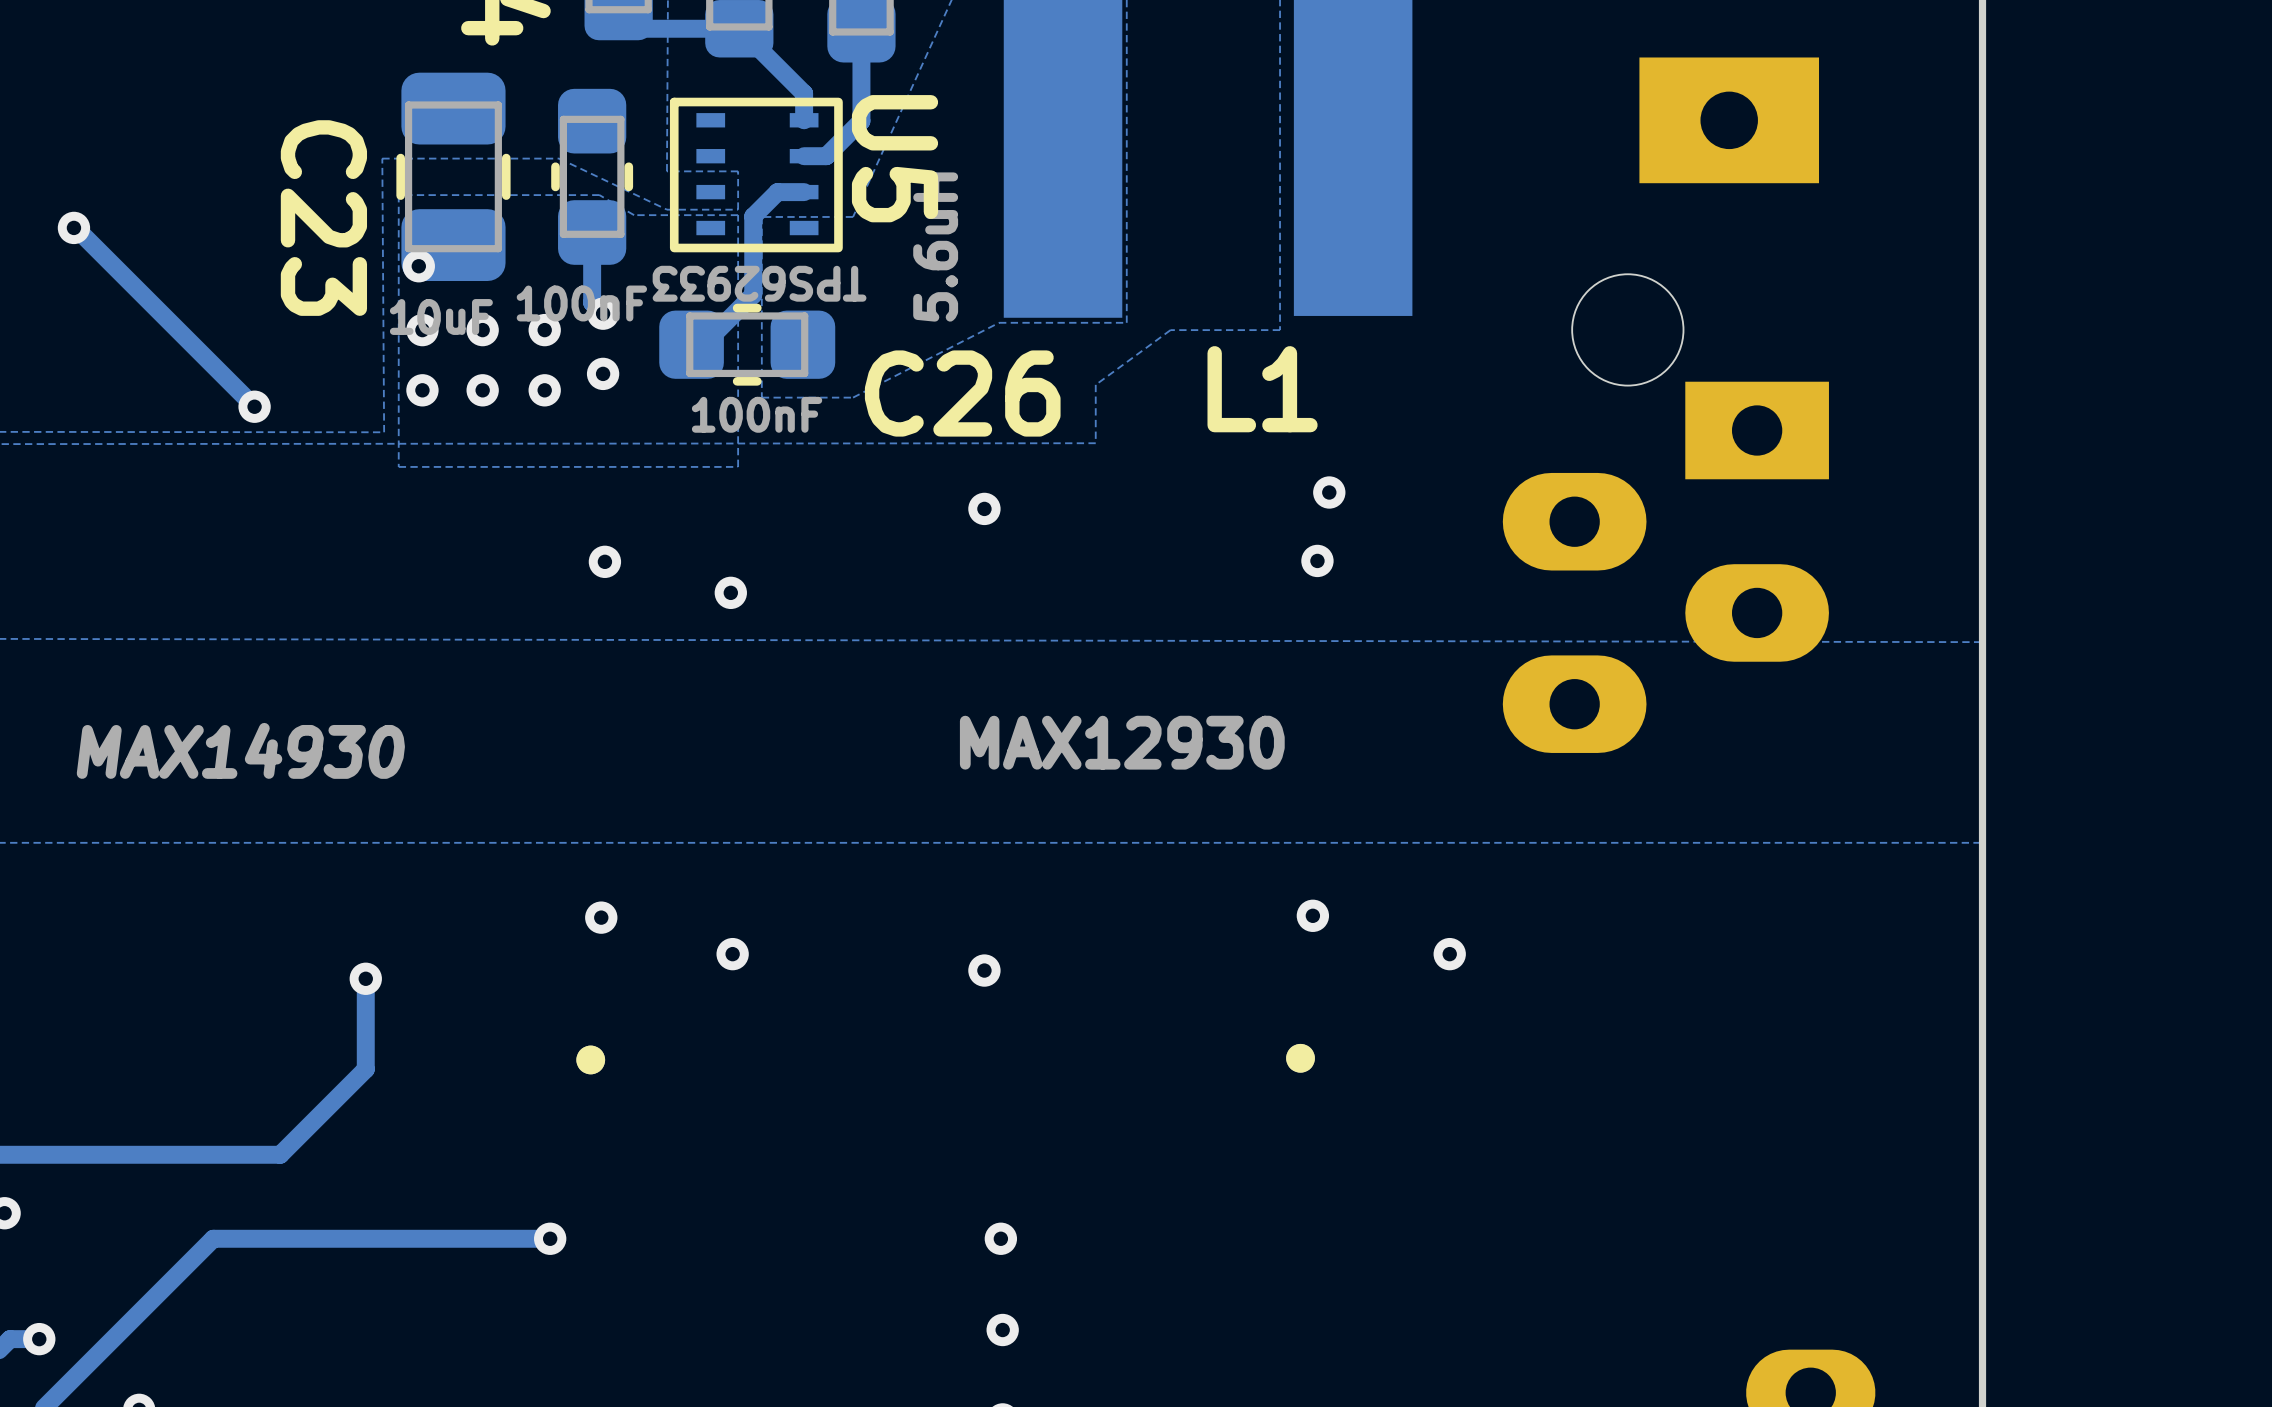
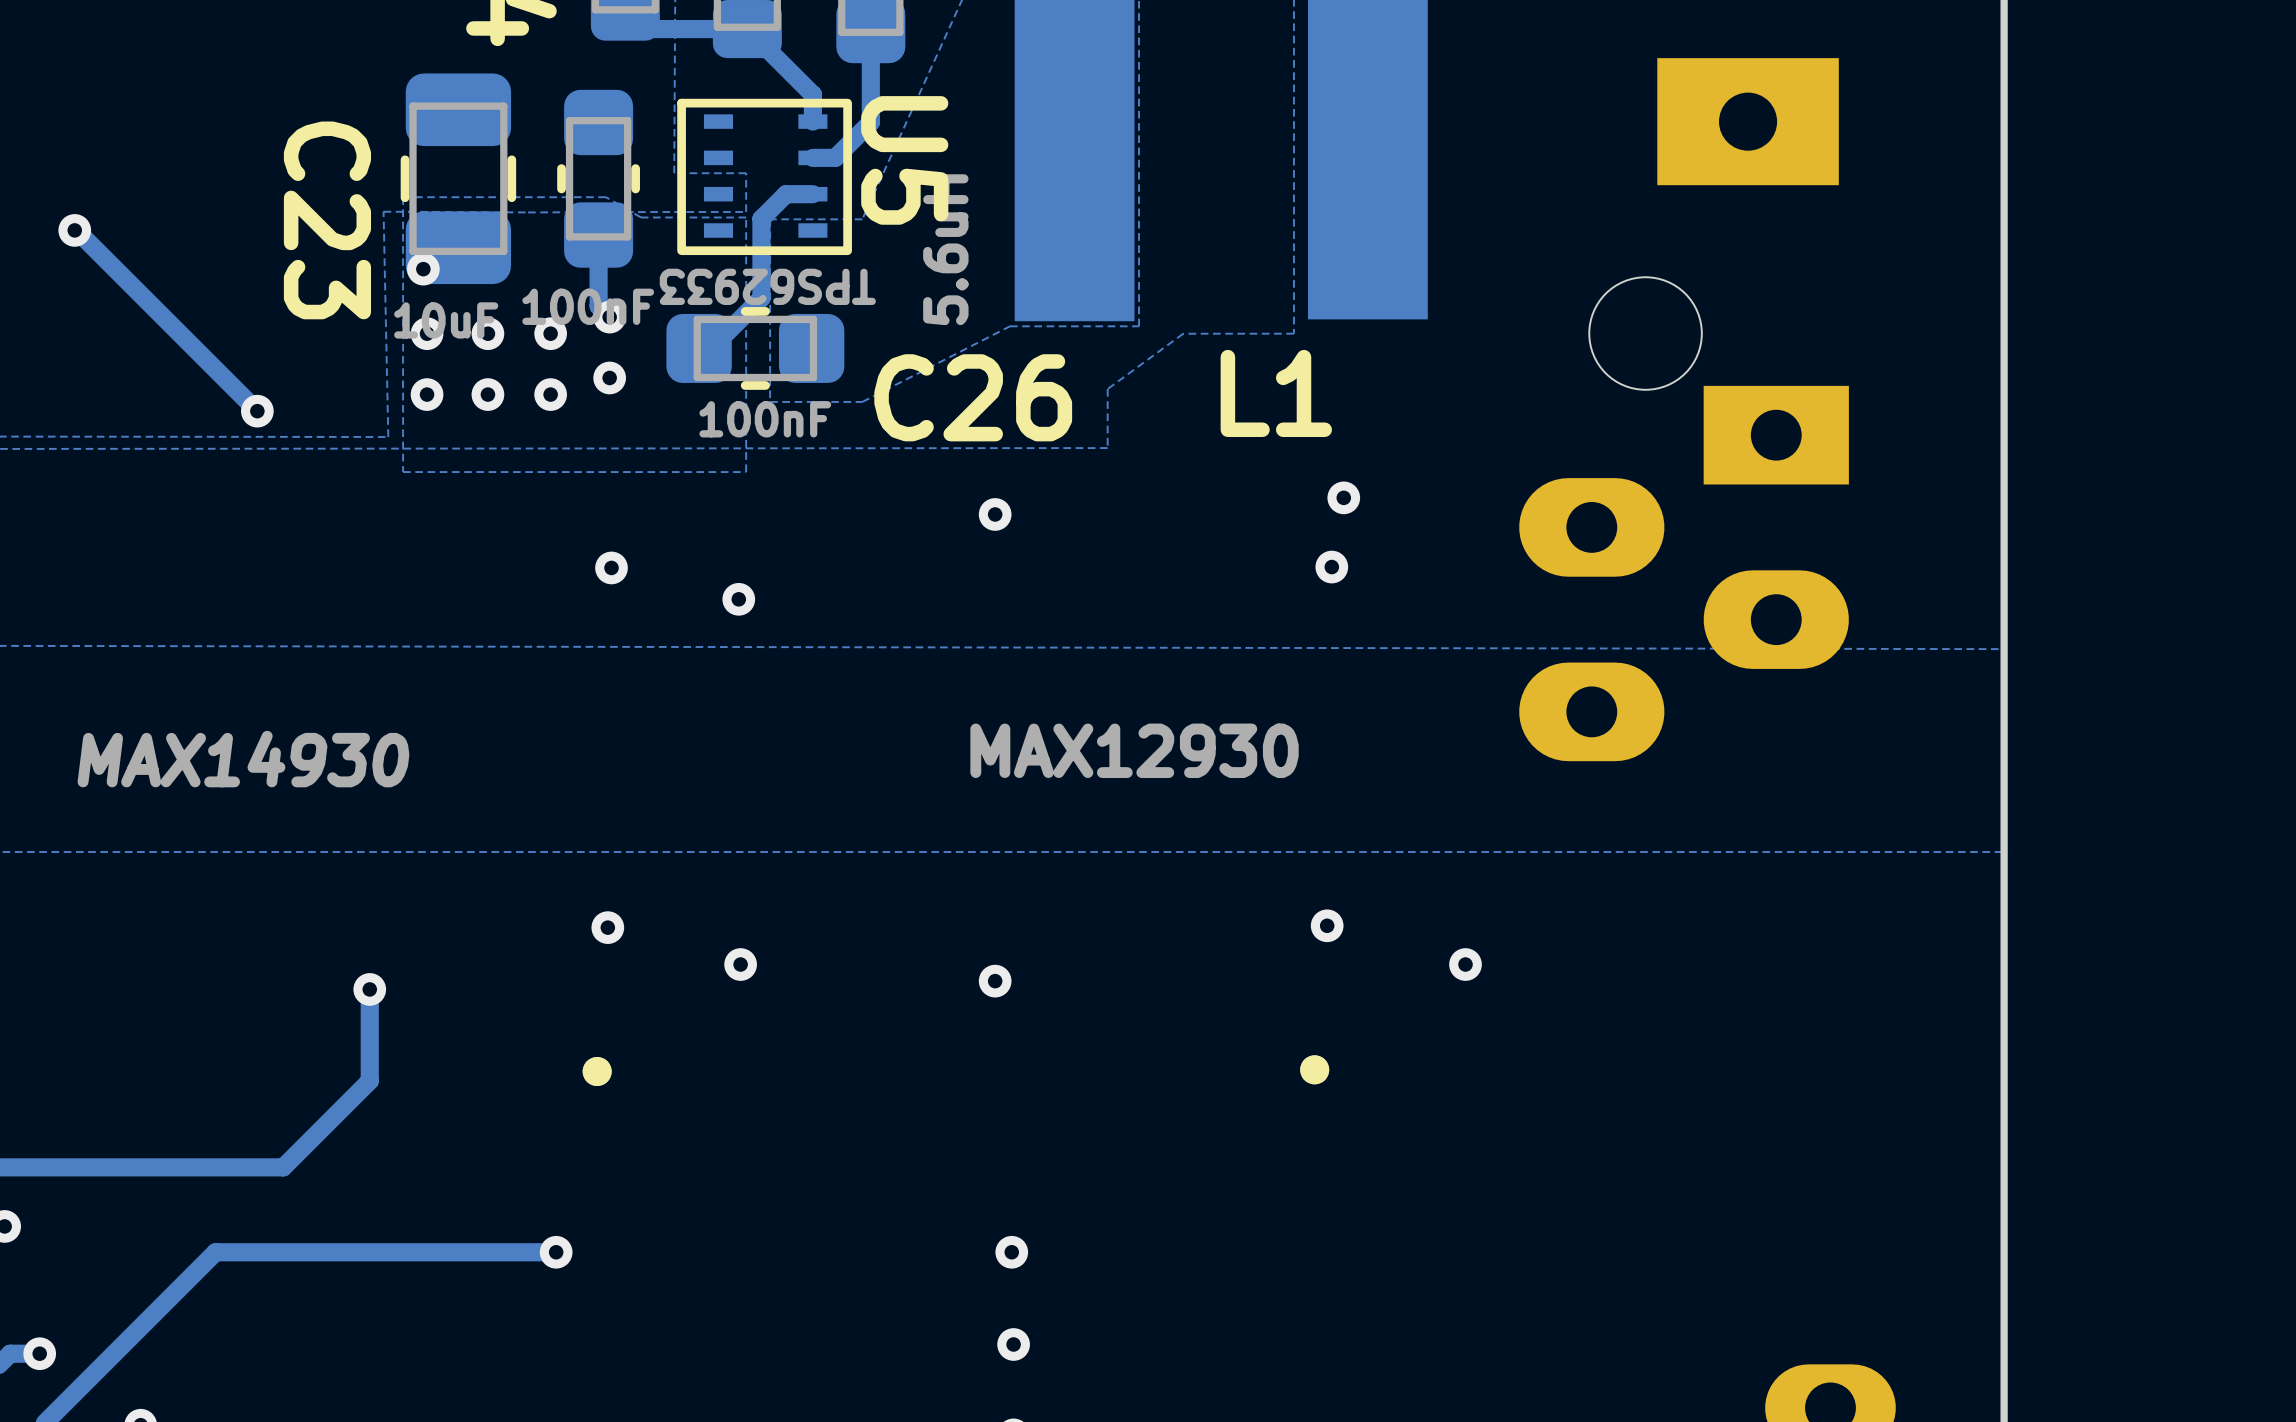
zone outline: (666, 209) (559, 158) (382, 158) (384, 432) -> (674, 211) (383, 211) (388, 436)

